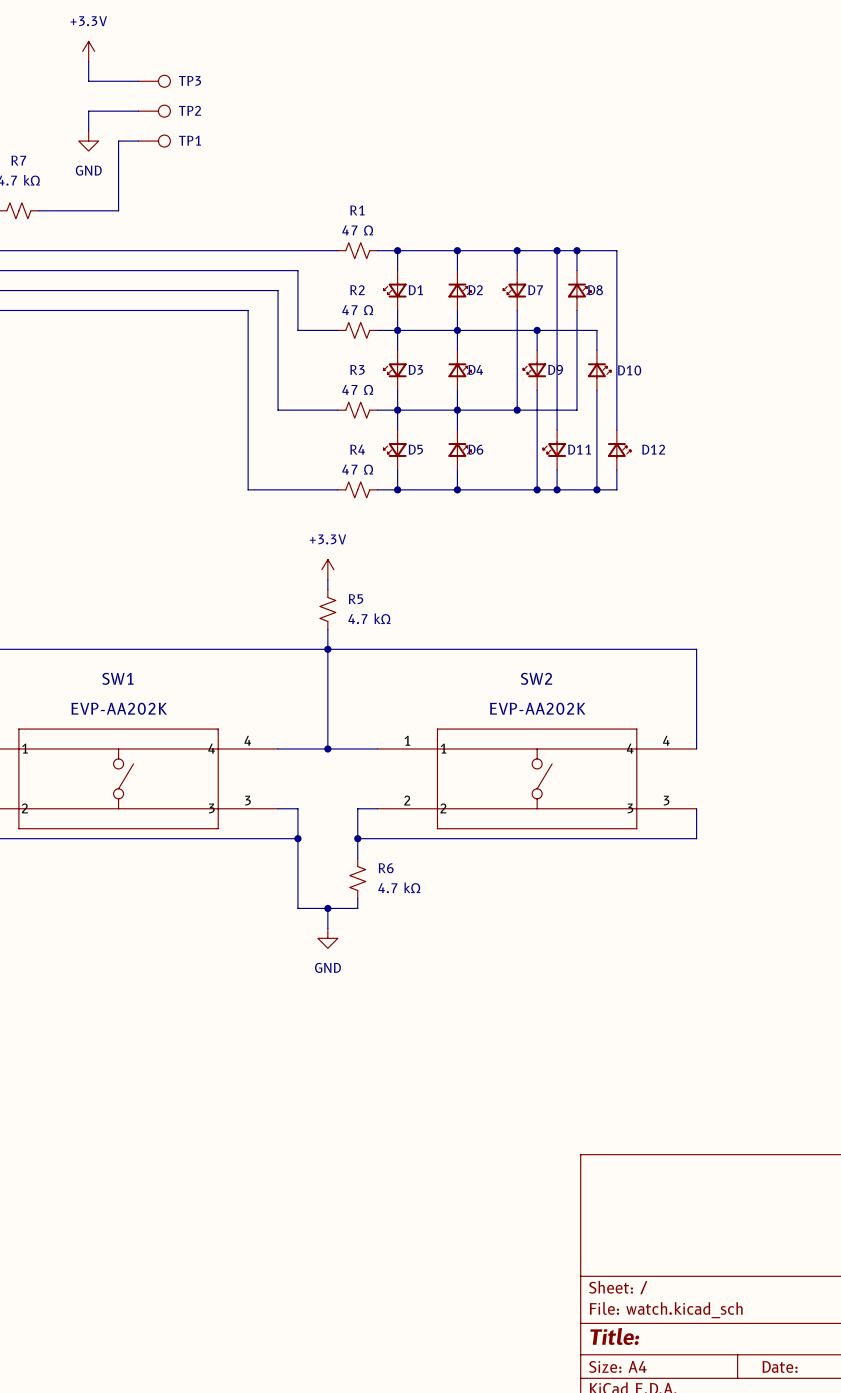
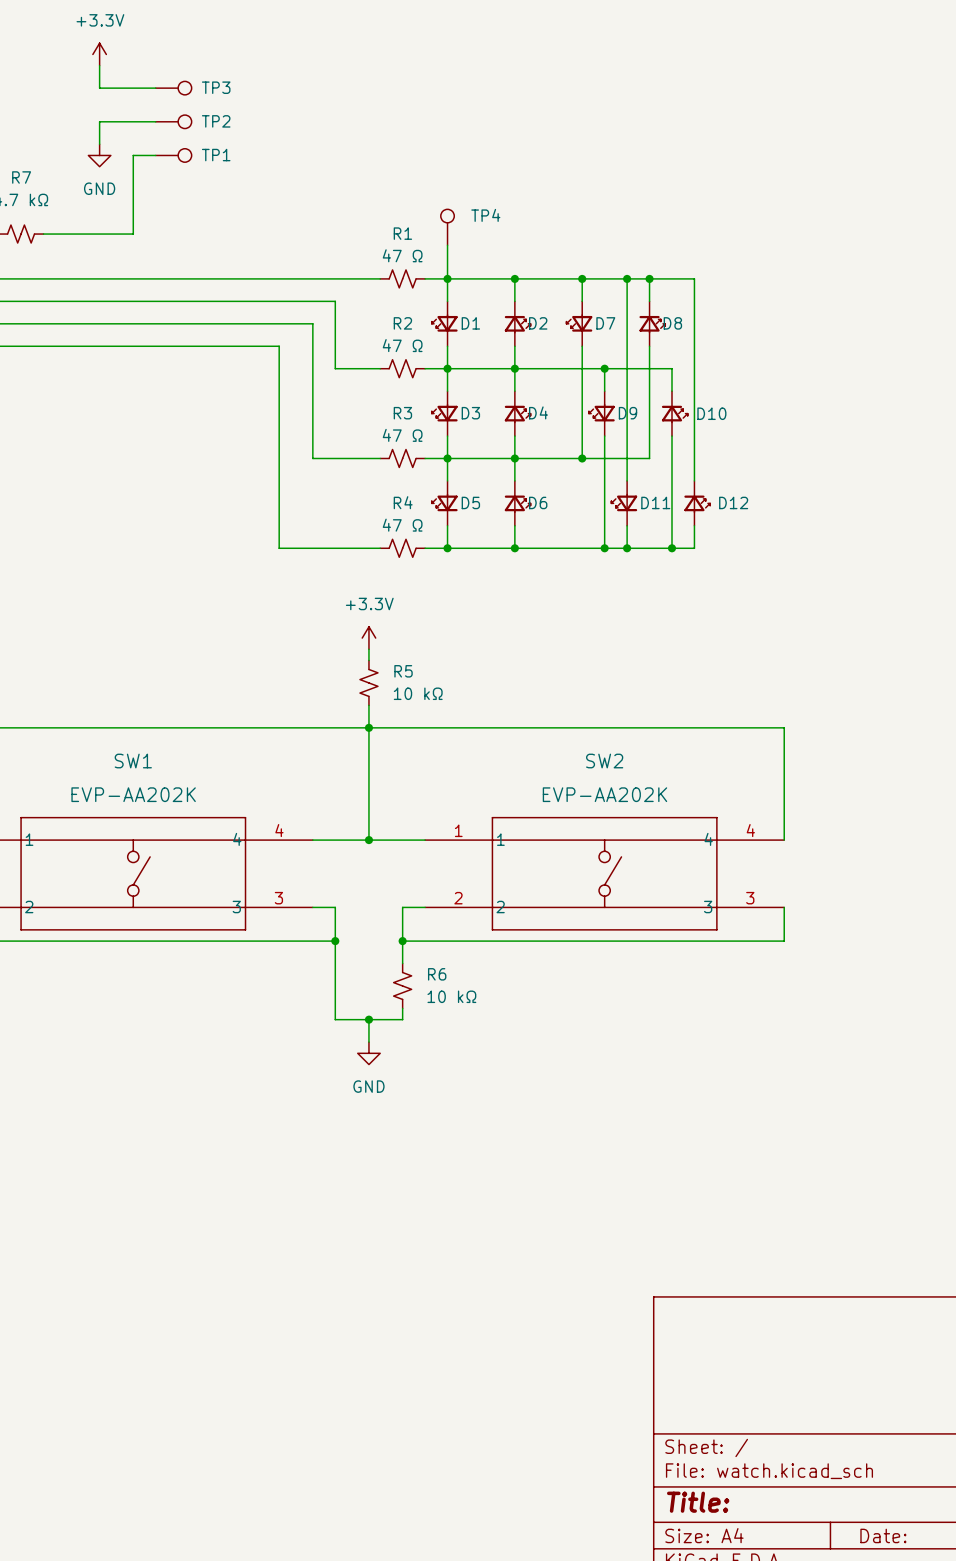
TP4: none -> (447, 227)
wire: none -> (447, 245) (447, 278)
R5 value: 4.7 kΩ (369, 618) -> 10 kΩ (418, 693)
R6 value: 4.7 kΩ (399, 887) -> 10 kΩ (451, 996)

